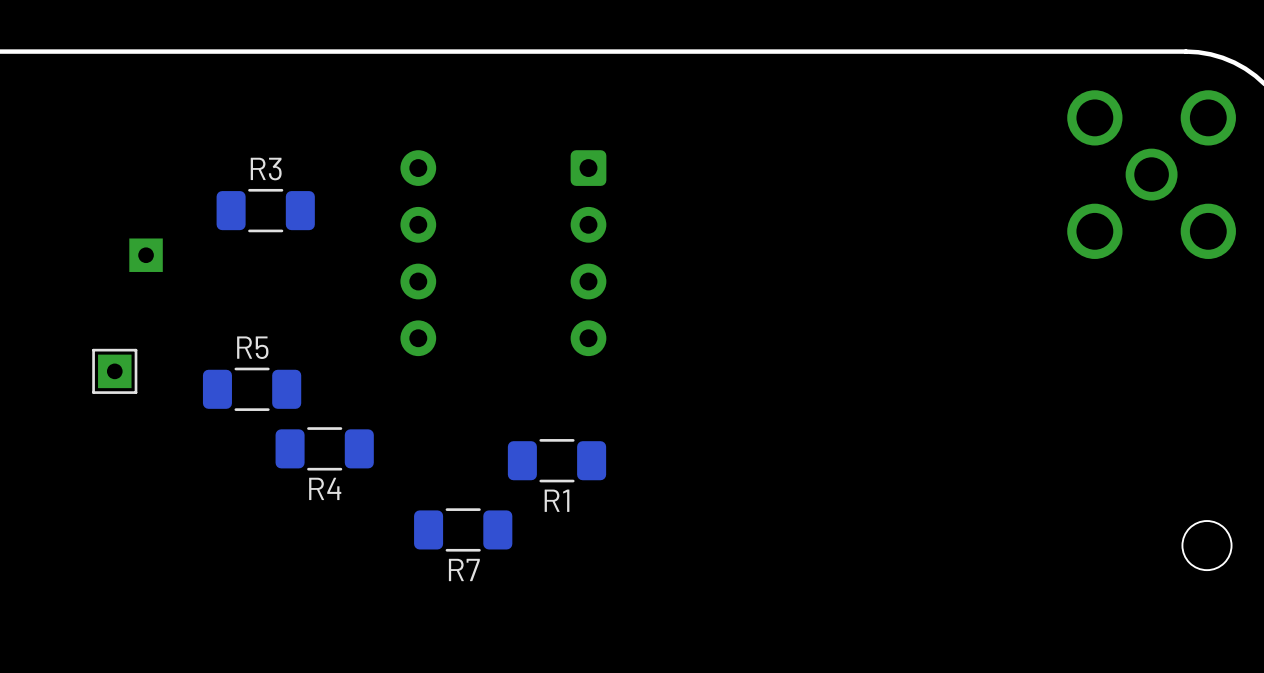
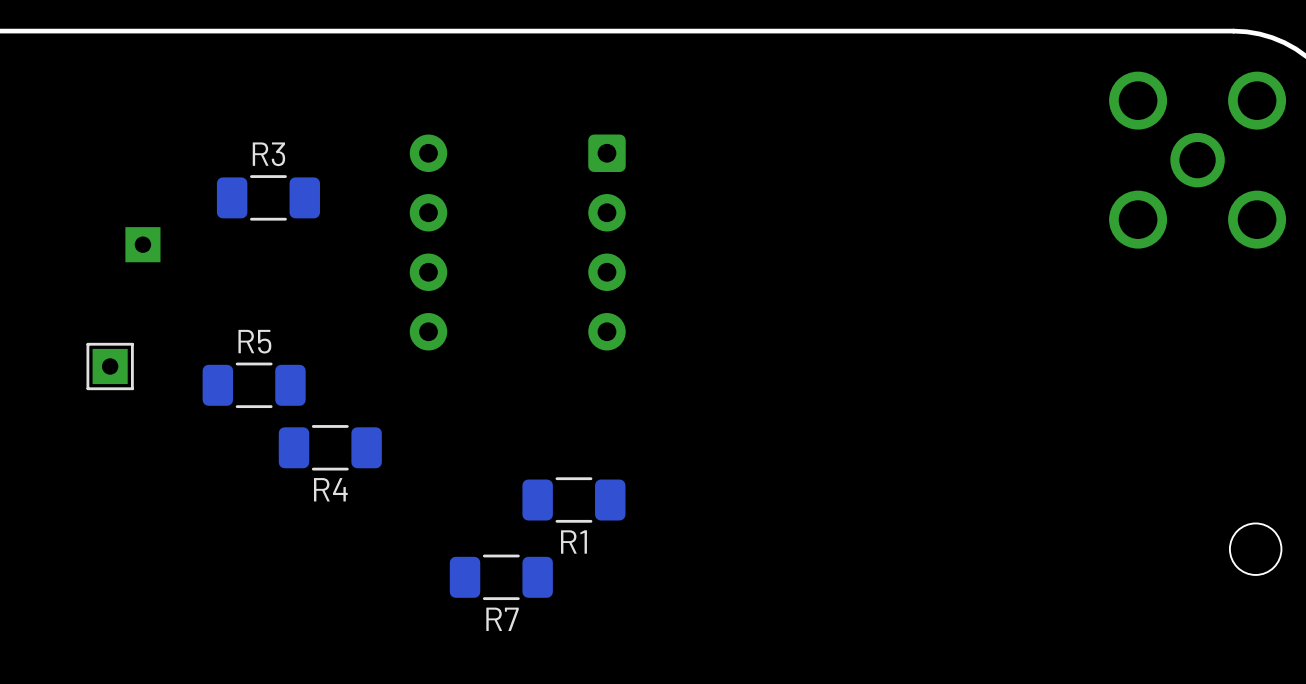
R1 position: (557, 460) -> (573, 500)
R7 position: (463, 529) -> (501, 577)

